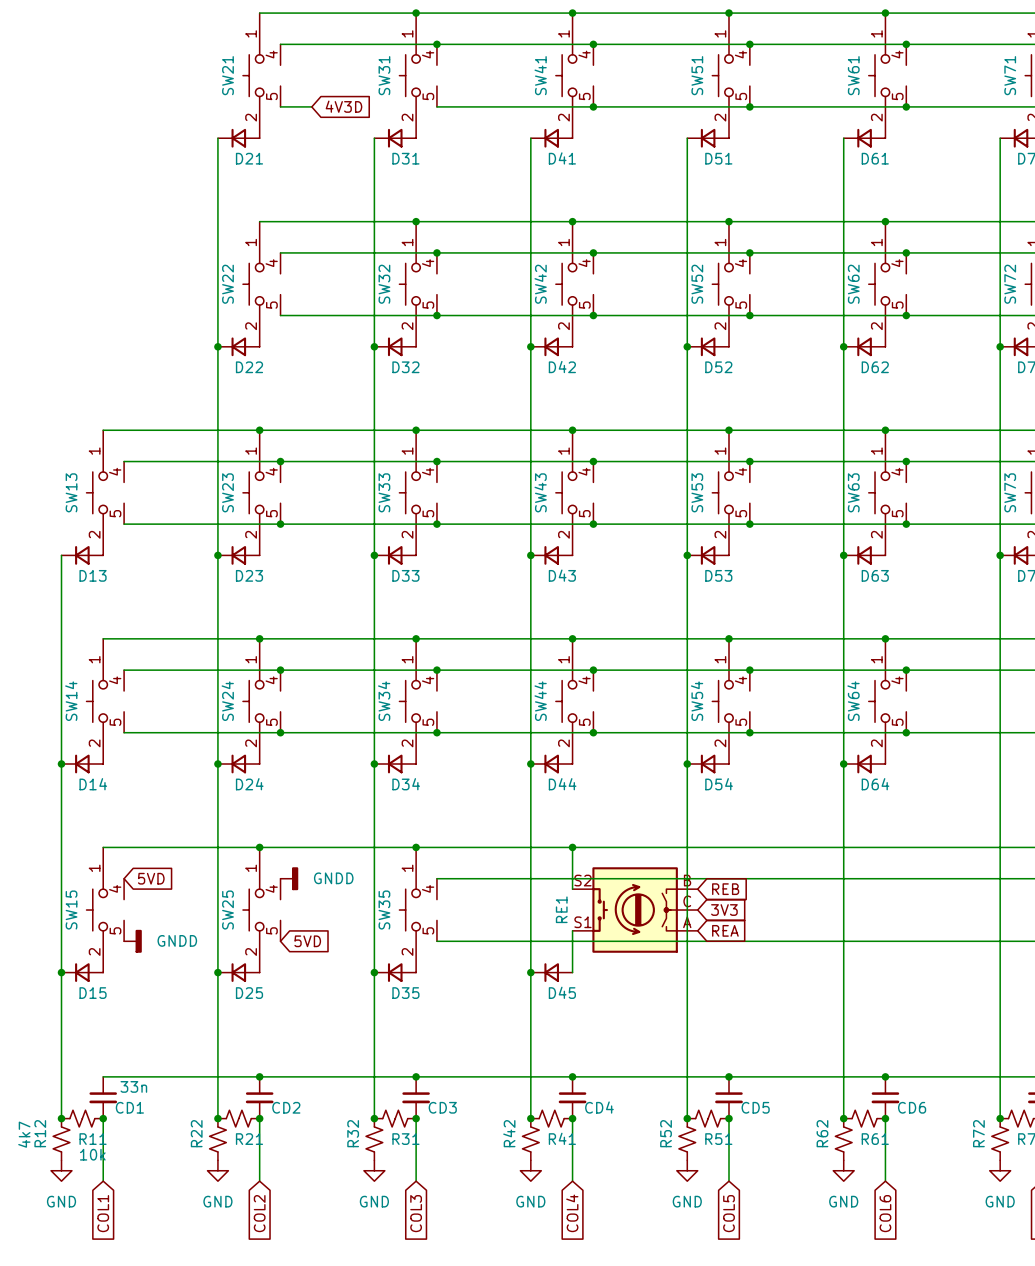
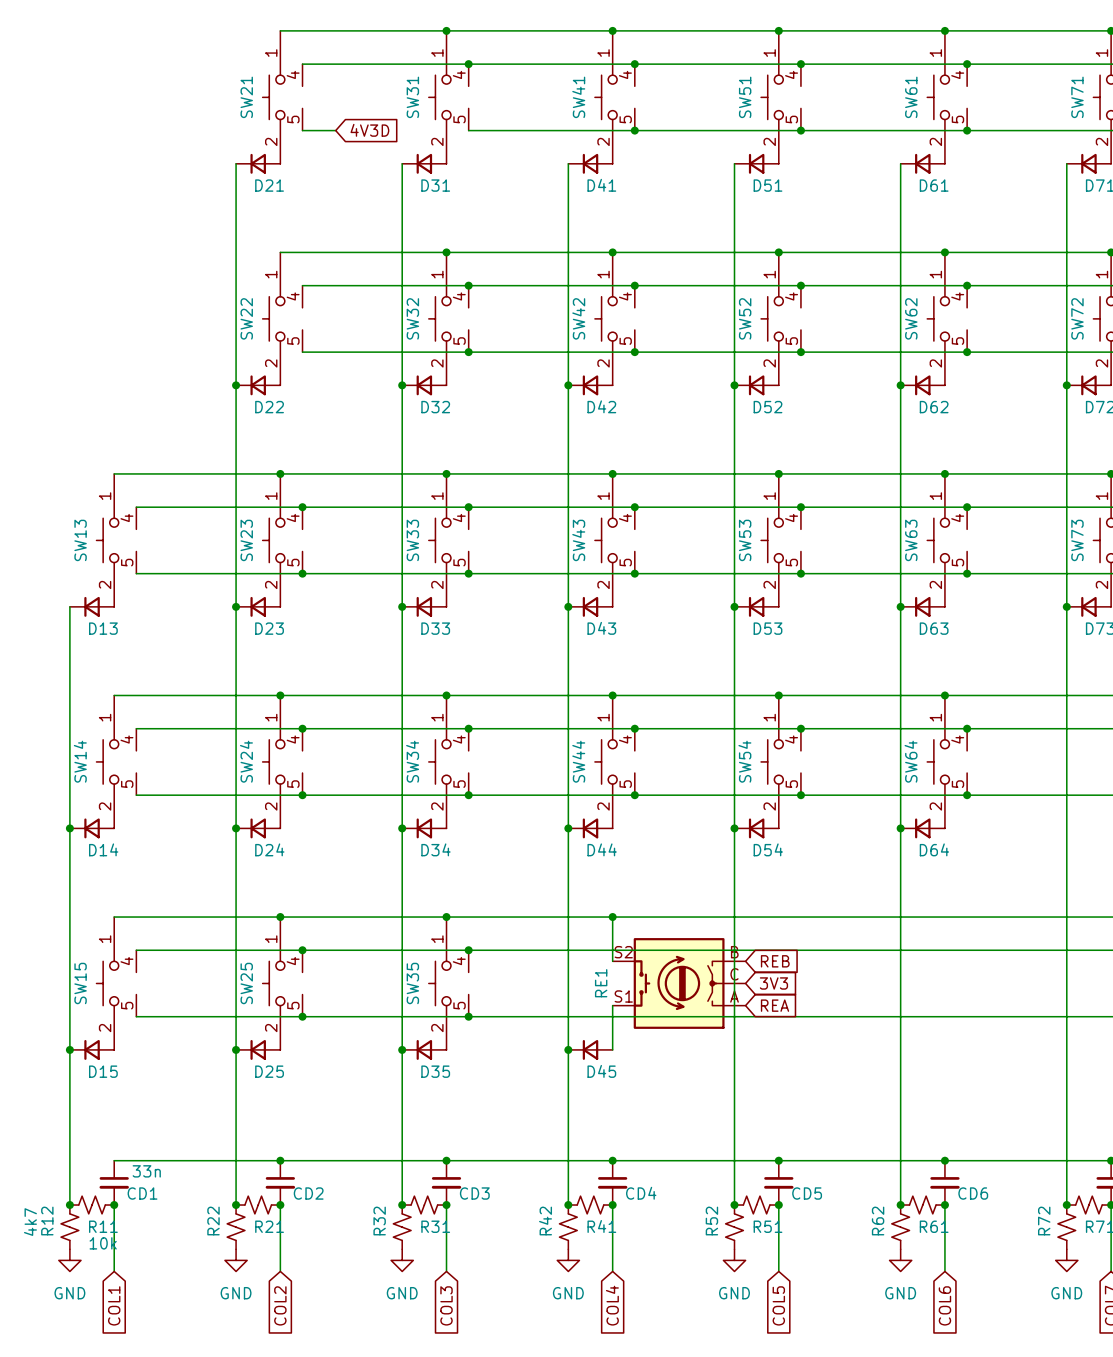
wire: none -> (136, 950) (468, 950)
global label: 5VD (151, 878) -> none
junction: none -> (302, 950)
power symbol: GNDD (289, 878) -> none
junction: none -> (468, 950)
wire: none -> (136, 1016) (468, 1016)
power symbol: GNDD (132, 941) -> none
junction: none -> (302, 1016)
global label: 5VD (307, 941) -> none
junction: none -> (468, 1016)

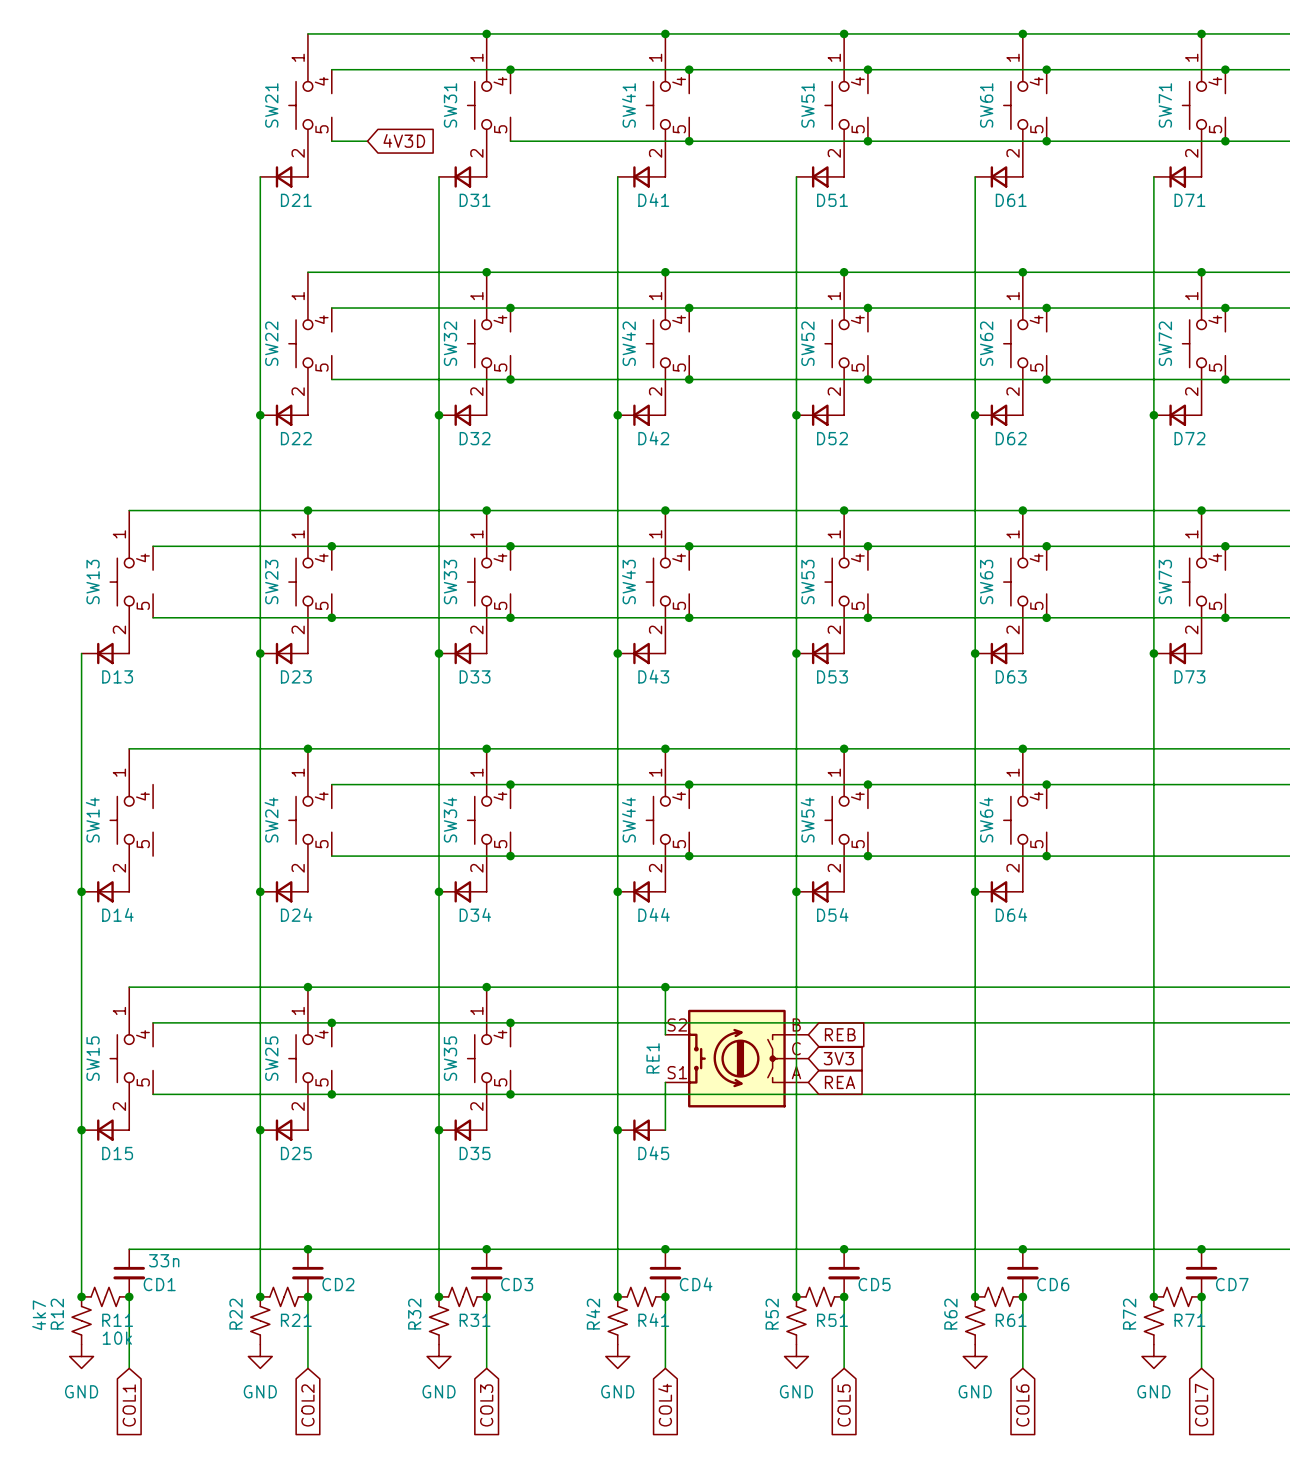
wire: (136, 728) (302, 728) -> none
junction: (302, 728) -> none
wire: (136, 795) (302, 795) -> none
junction: (302, 795) -> none

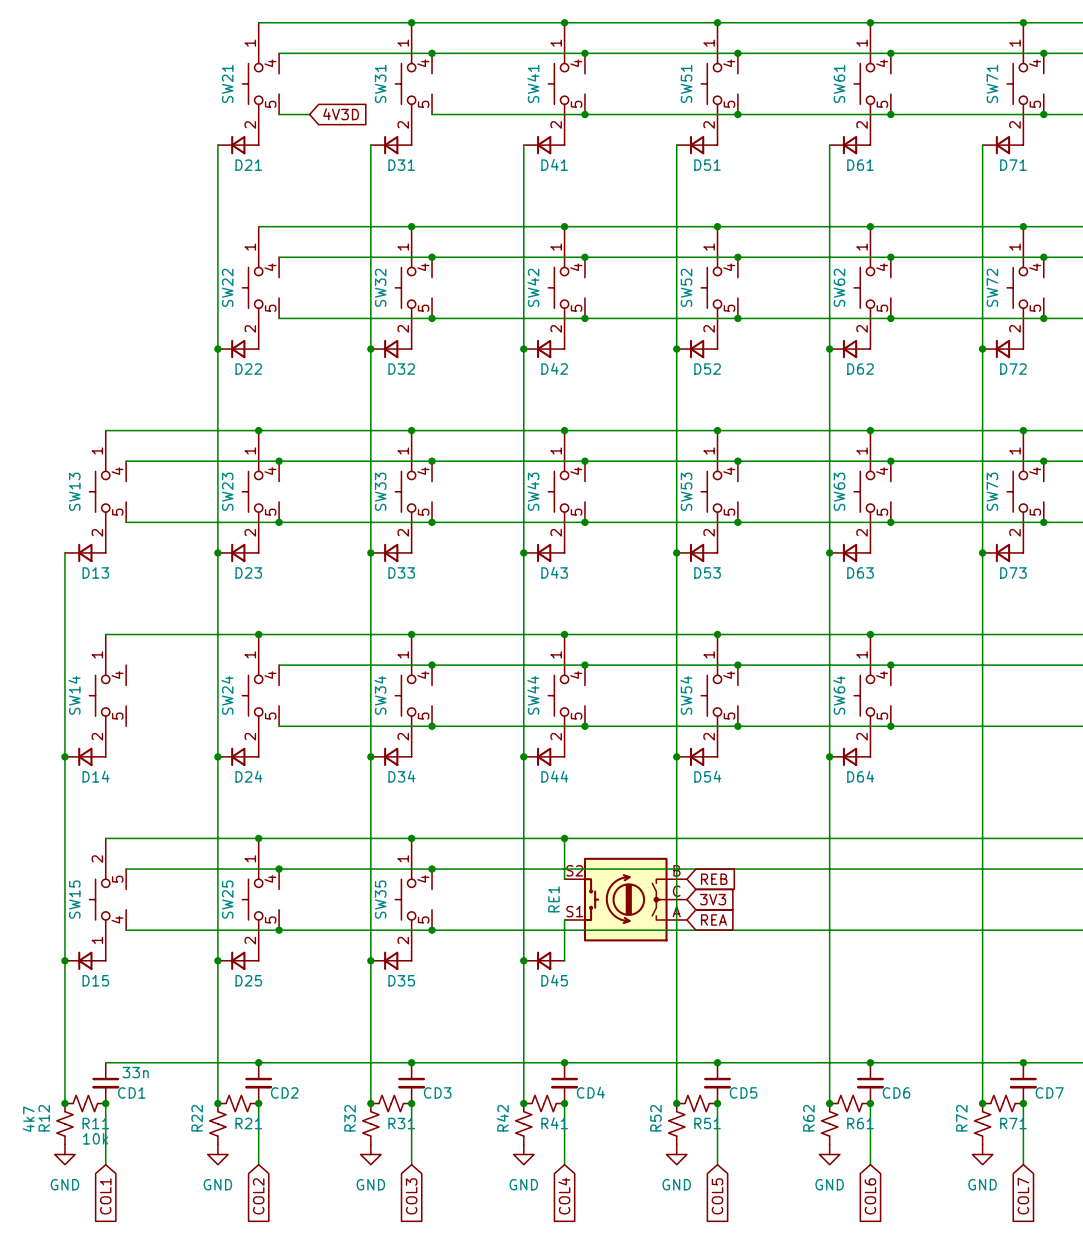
SW15 flip: as is (122, 1058) -> up-down (99, 899)

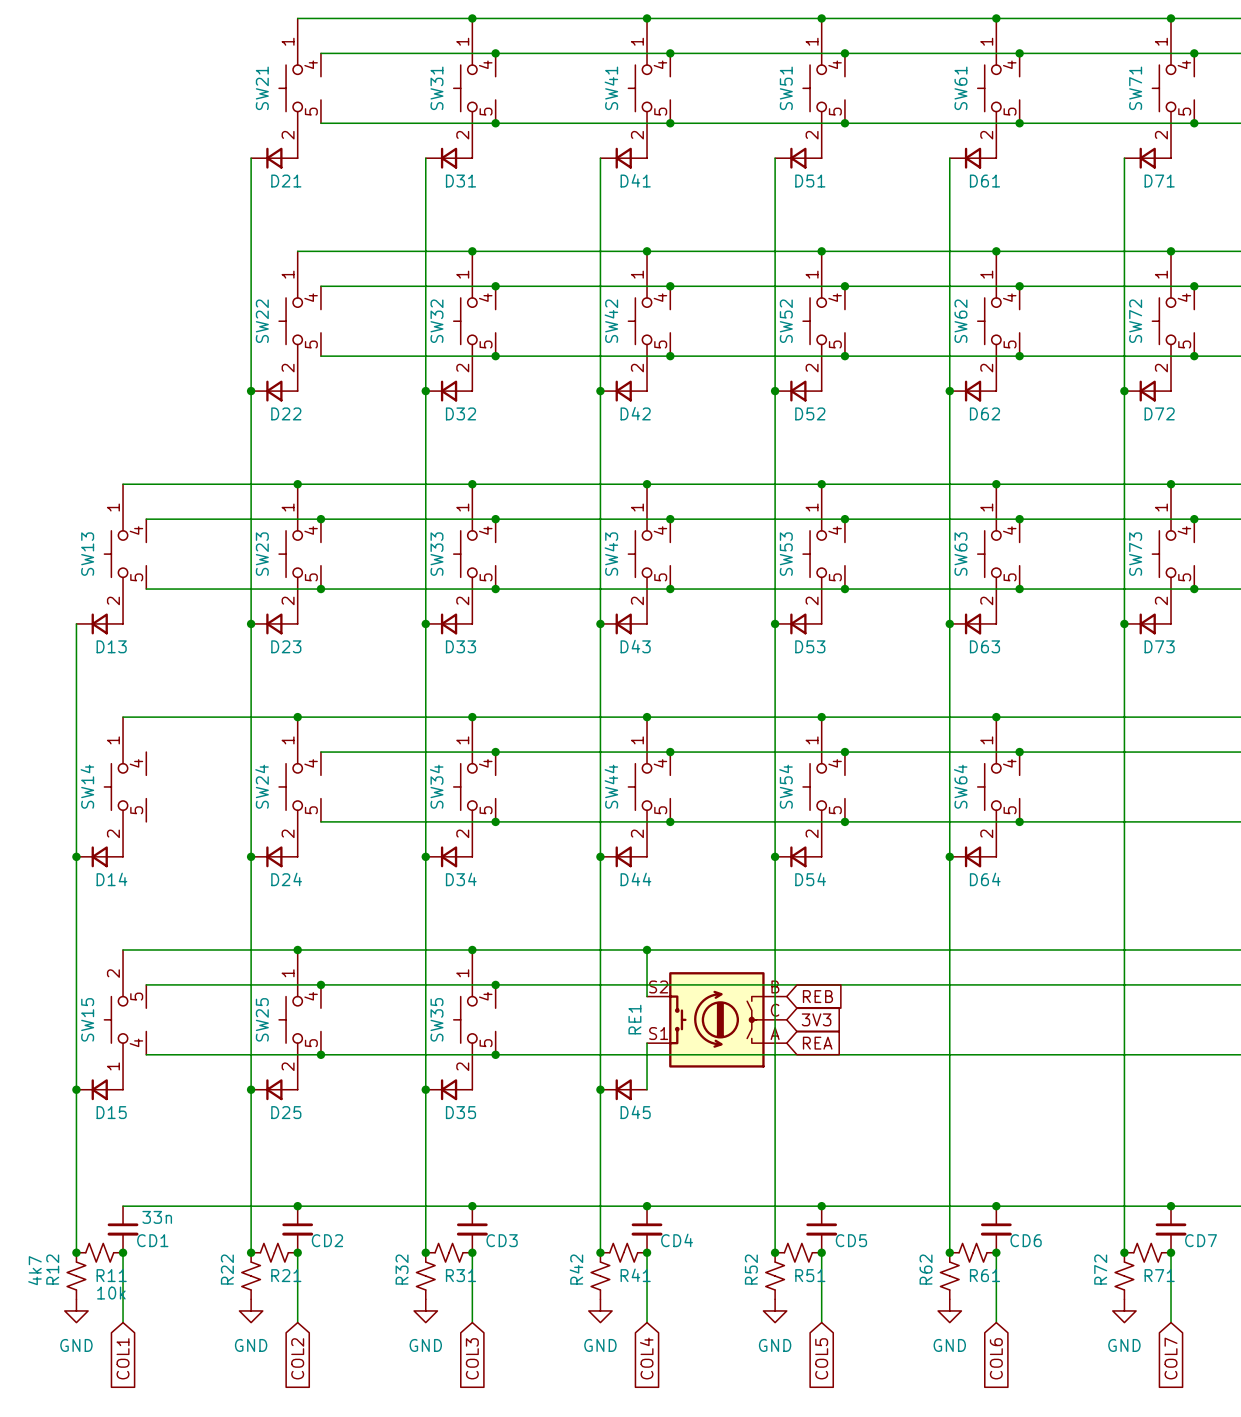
wire: none -> (355, 123) (495, 123)
global label: 4V3D (341, 114) -> none
junction: none -> (495, 123)

